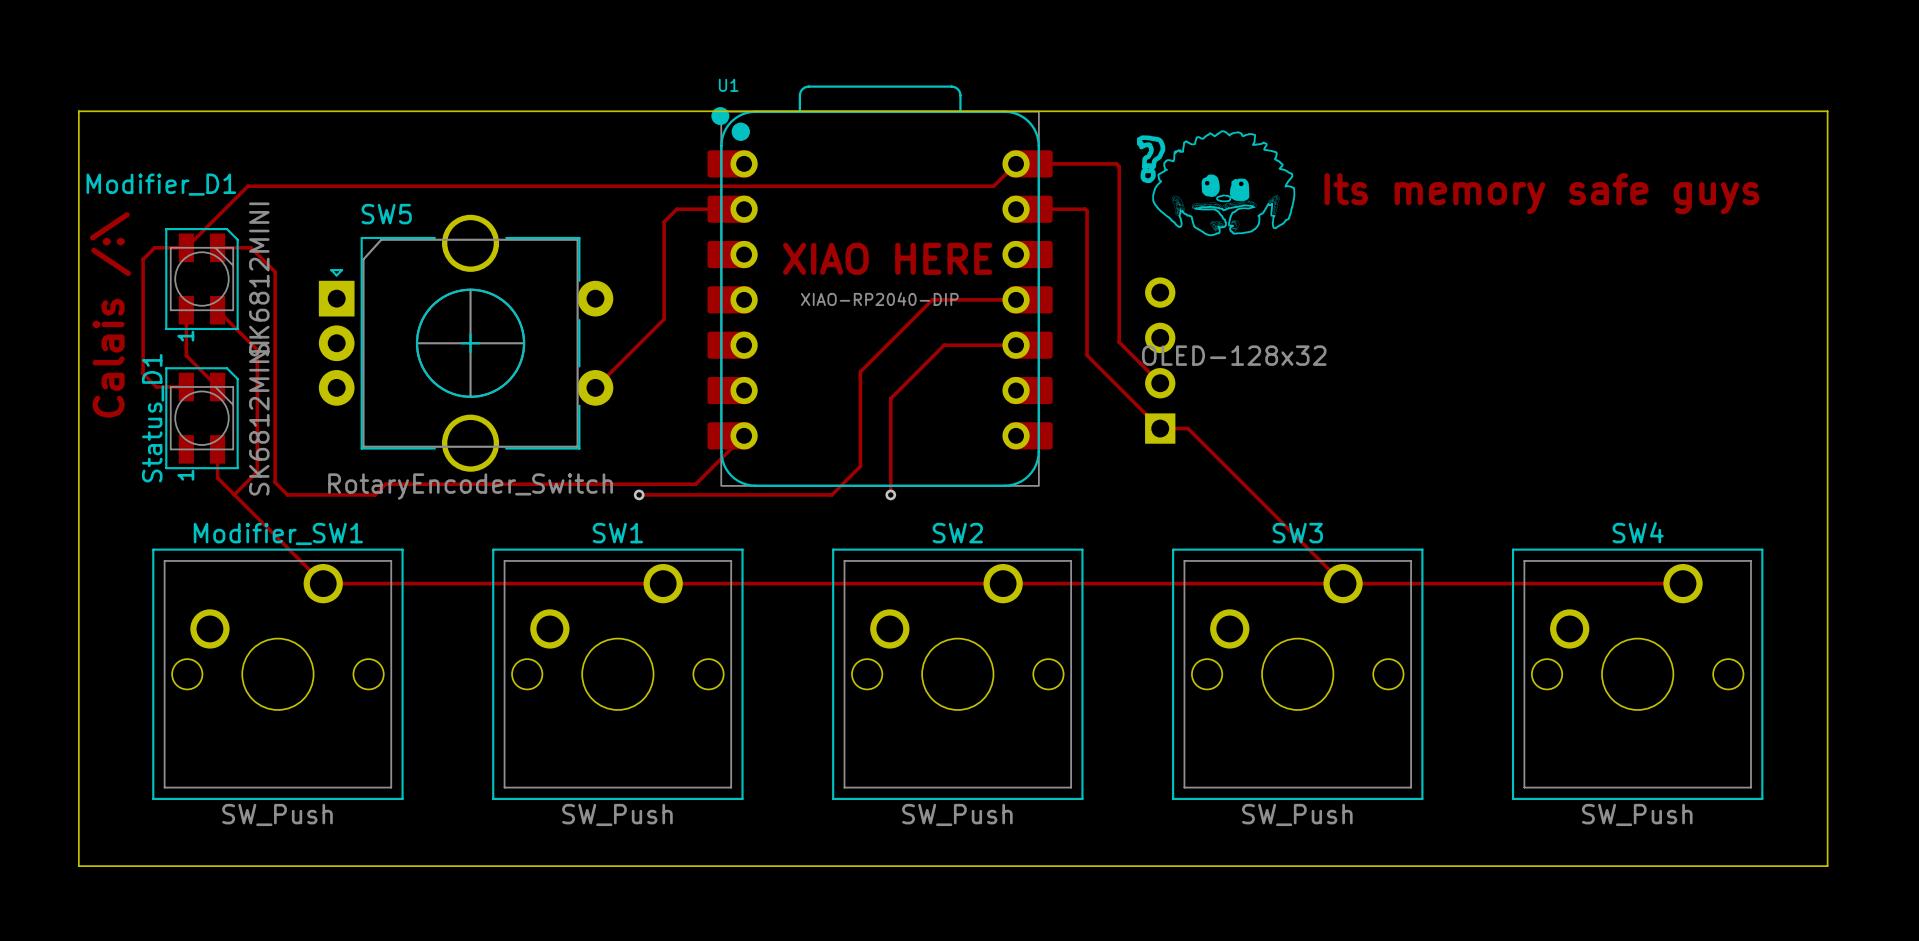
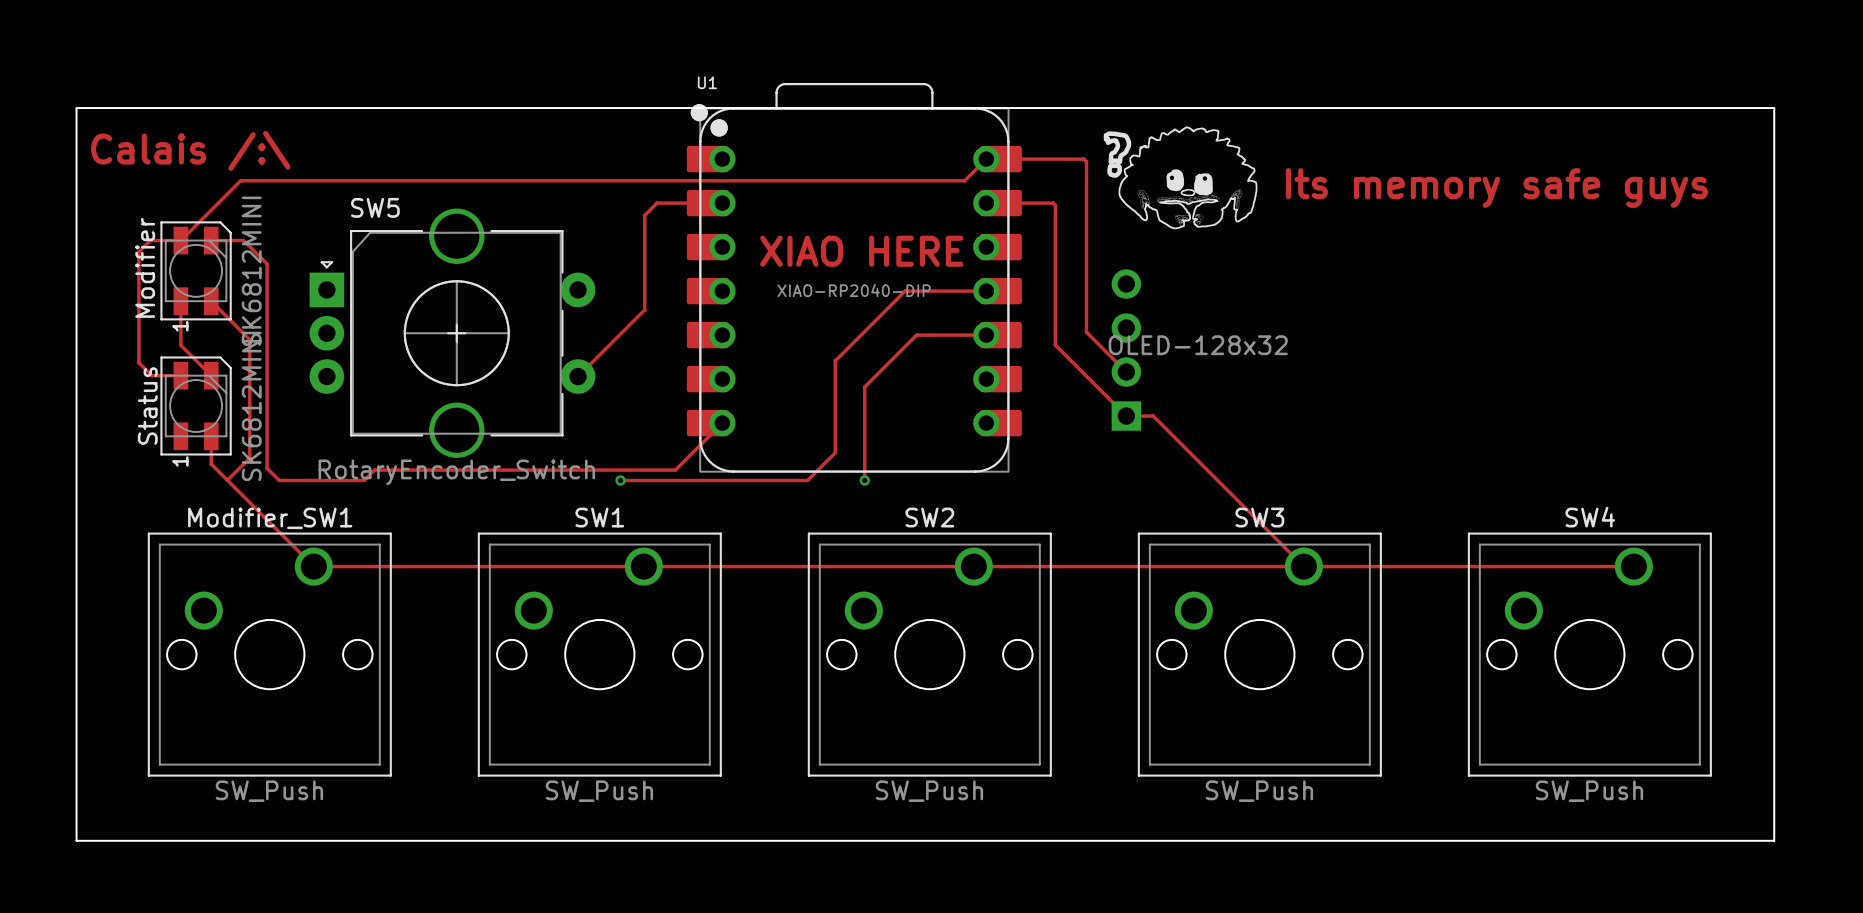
Modifier_D1 name: Modifier_D1 (161, 184) -> Modifier (145, 267)
text rotation: 0° (110, 314) -> 90° clockwise (190, 150)
Status_D1 name: Status_D1 (153, 418) -> Status (147, 405)

